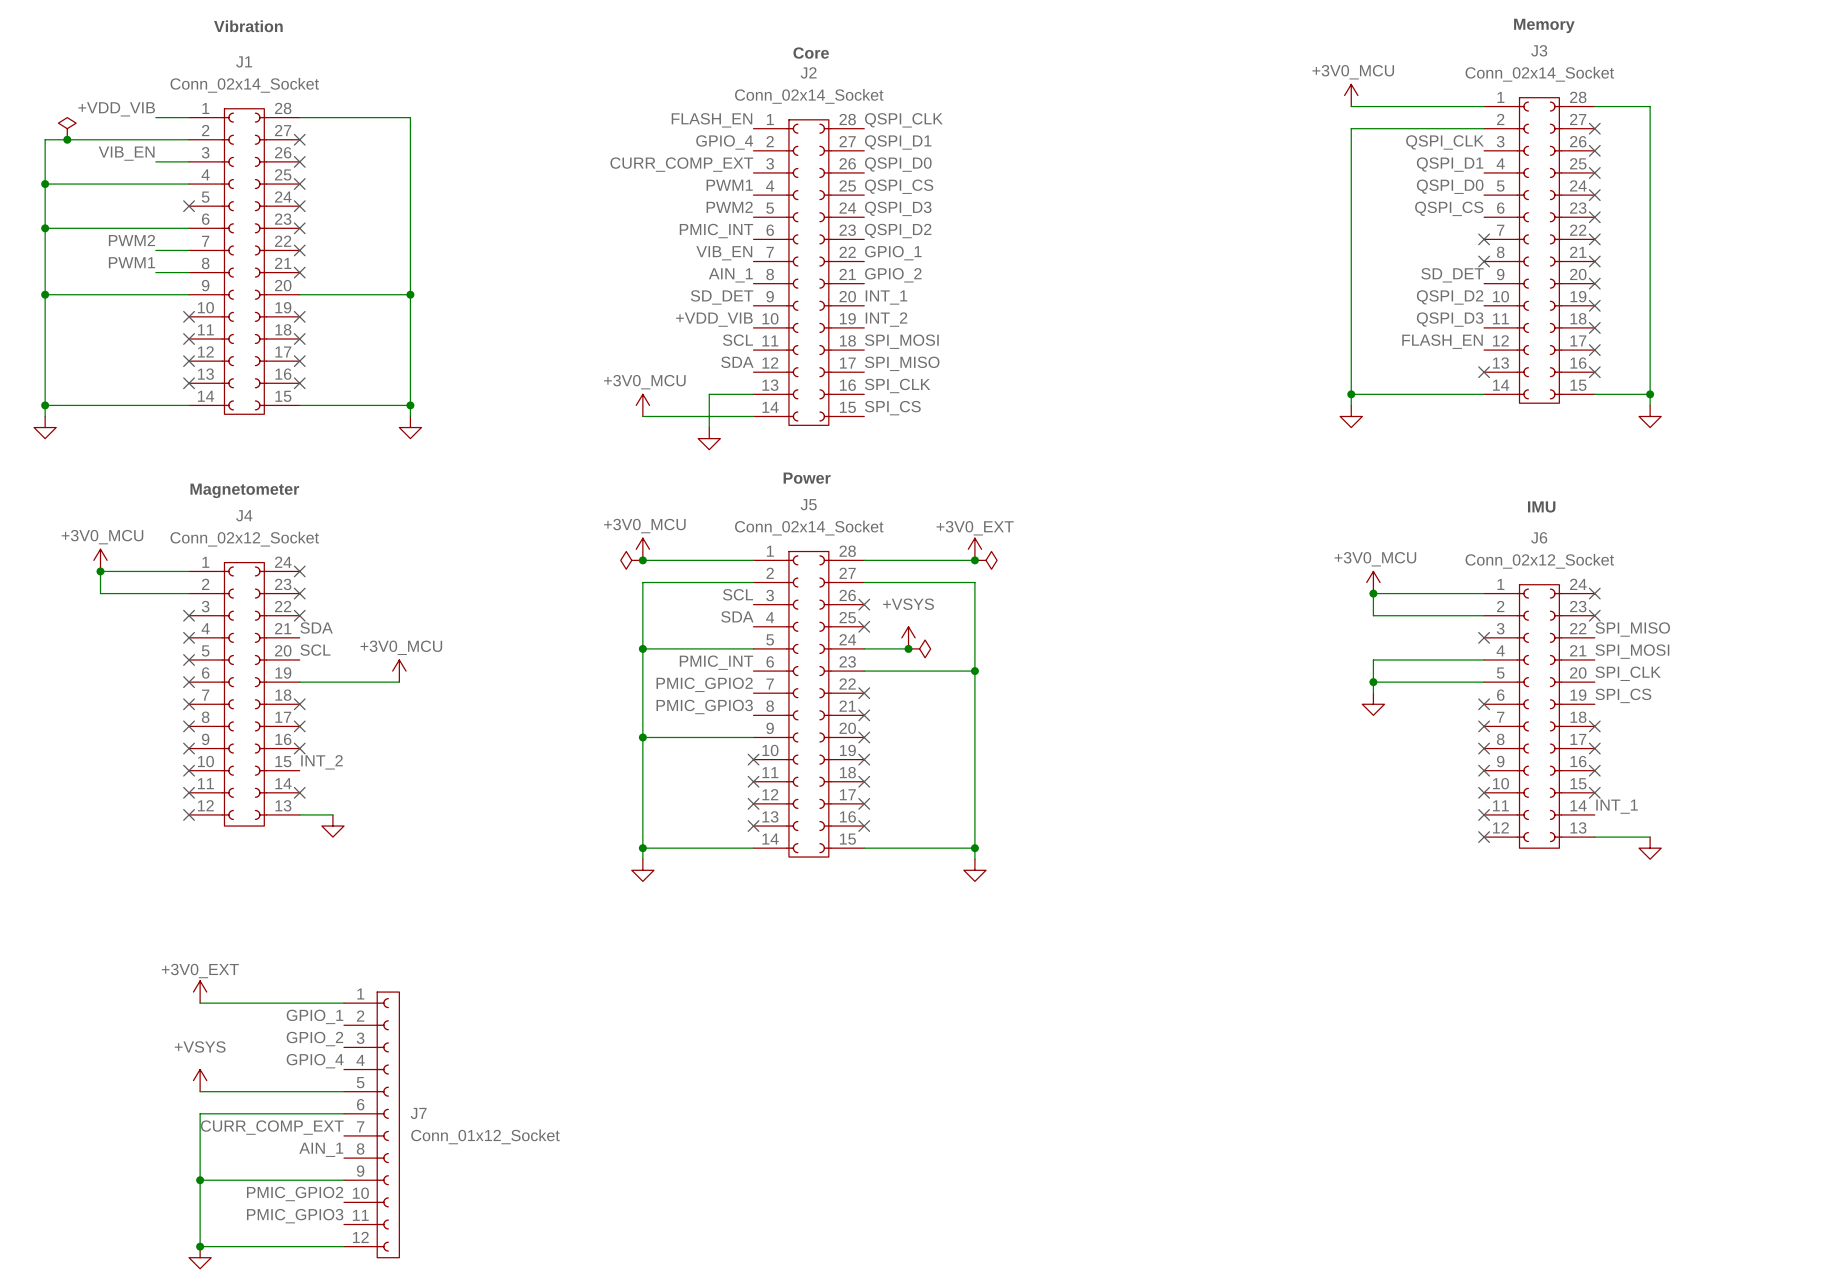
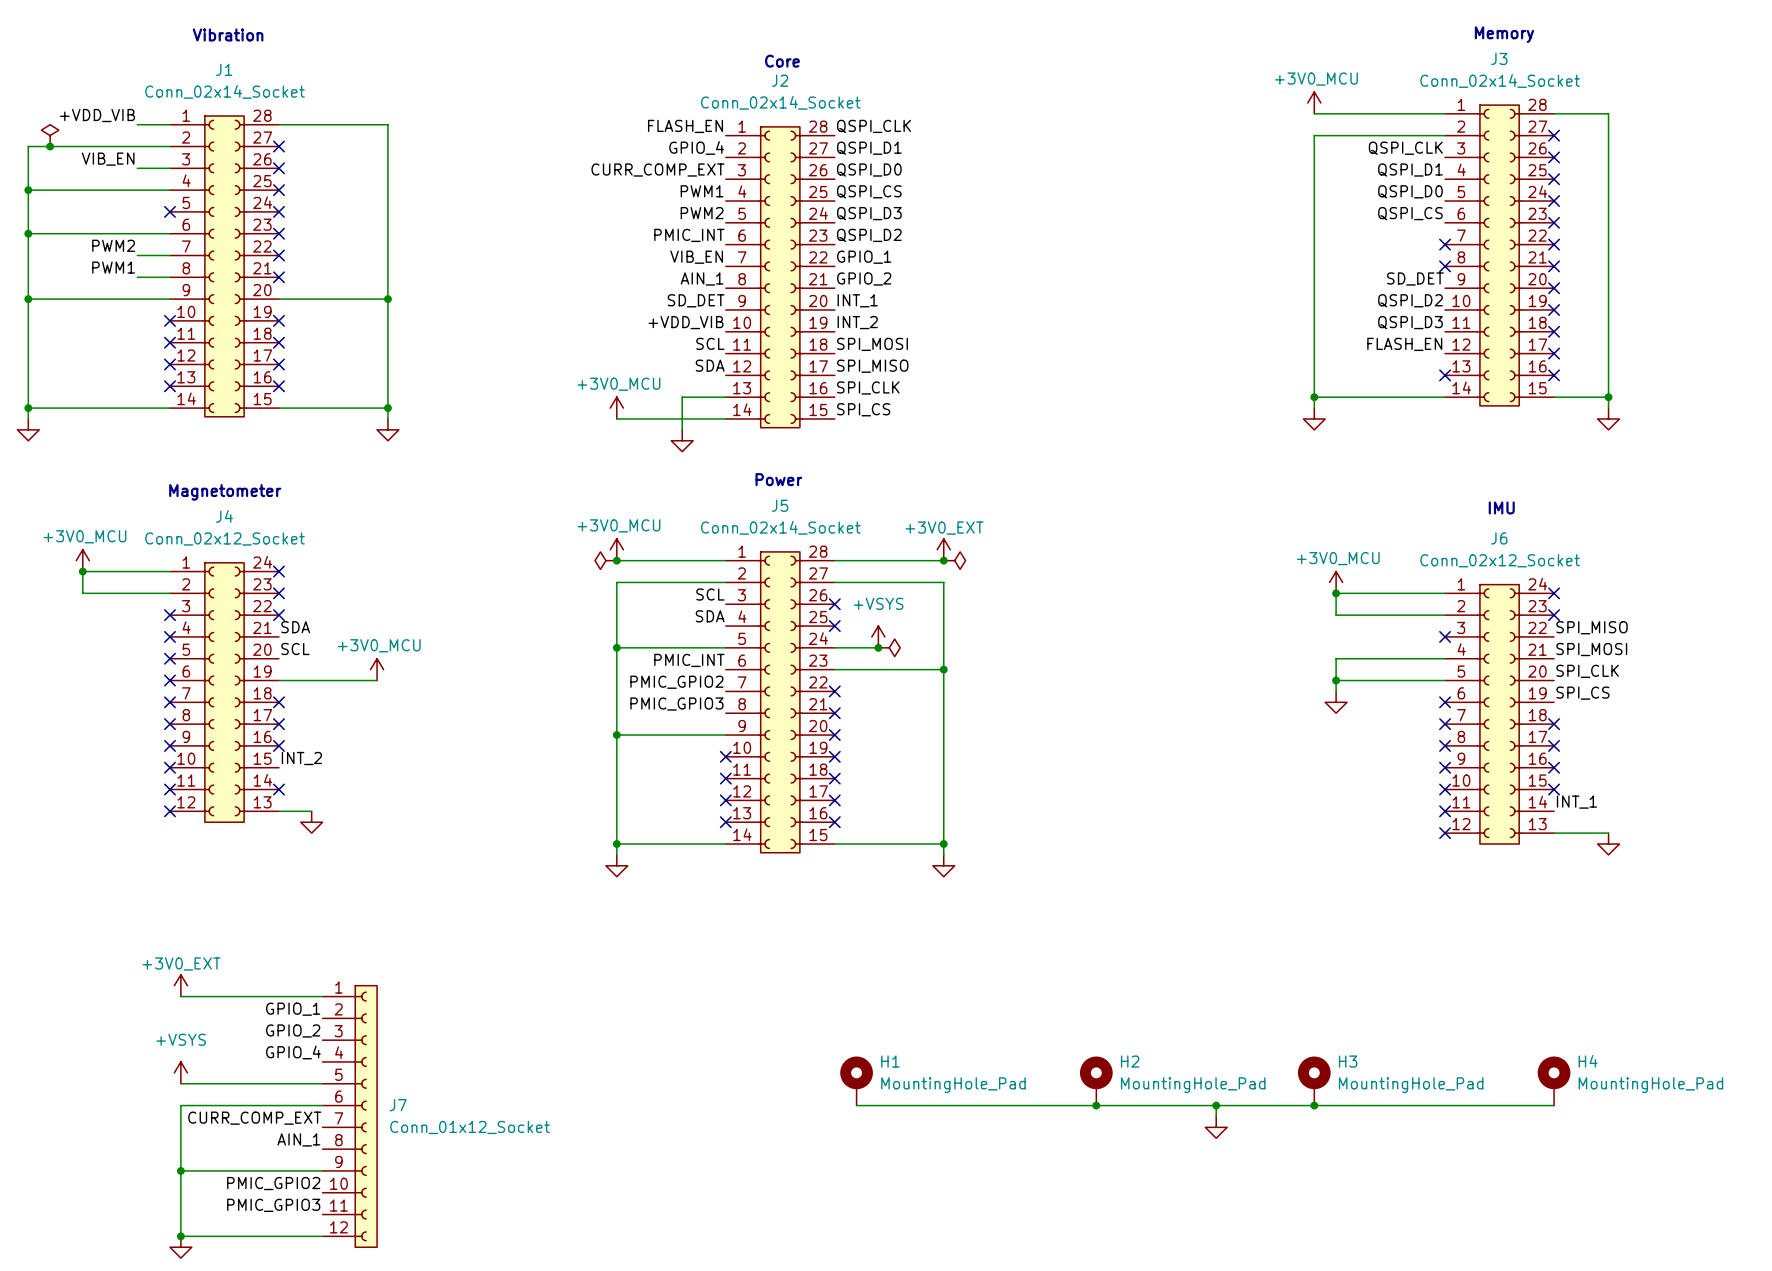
H1: none -> MountingHole_Pad (856, 1081)
H2: none -> MountingHole_Pad (1096, 1081)
H3: none -> MountingHole_Pad (1314, 1081)
H4: none -> MountingHole_Pad (1554, 1081)
wire: none -> (856, 1105) (1554, 1105)
junction: none -> (1096, 1105)
wire: none -> (1216, 1105) (1216, 1116)
junction: none -> (1216, 1105)
junction: none -> (1314, 1105)
power symbol: none -> (1216, 1127)

